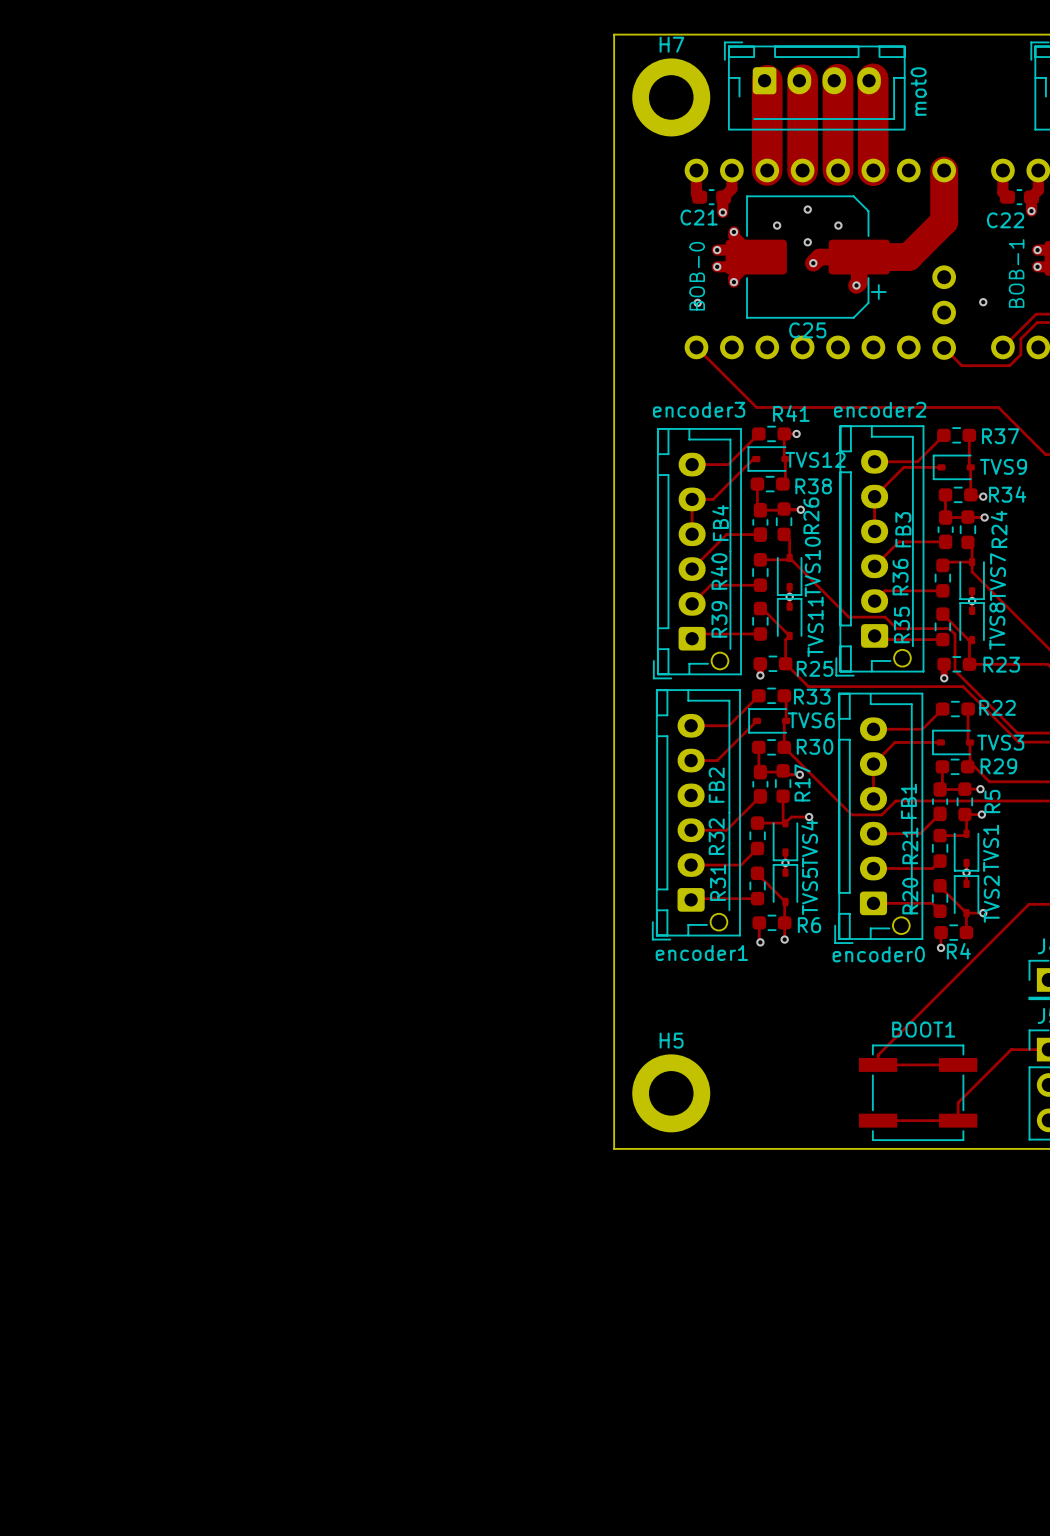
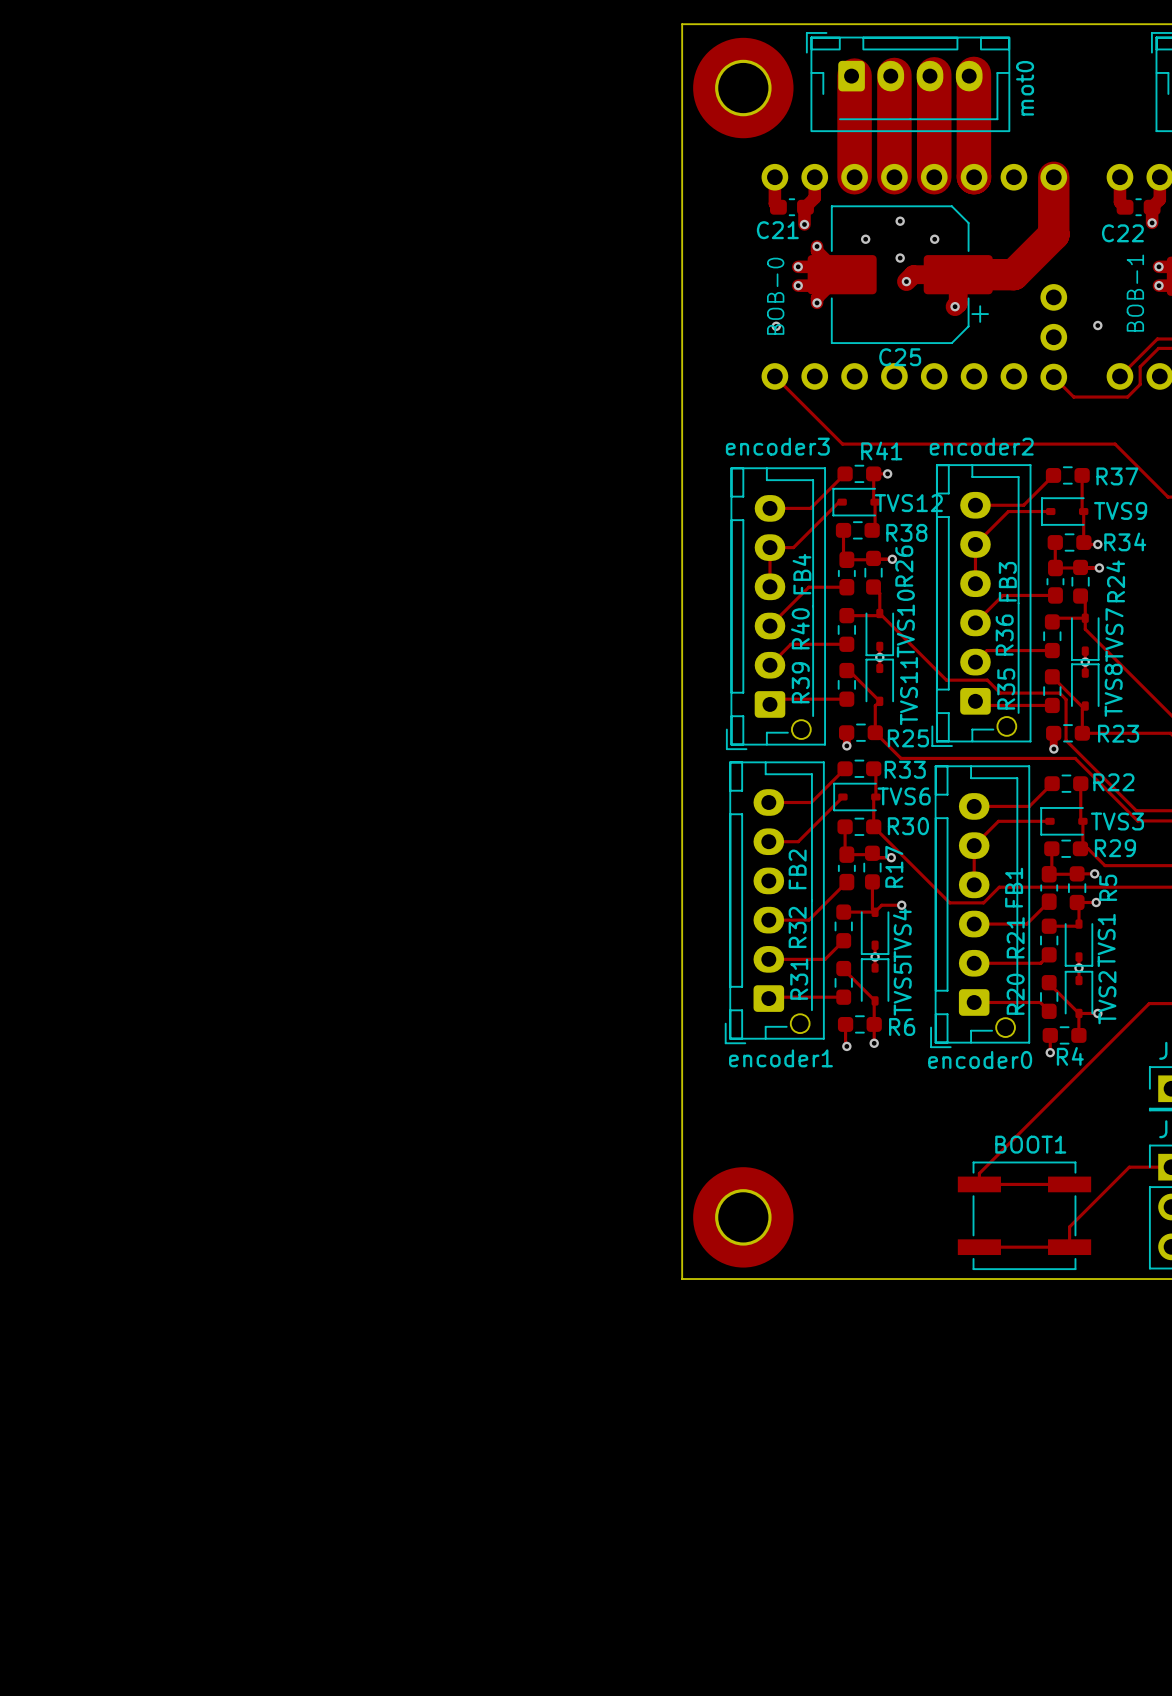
part: none -> (743, 88)
H7: (671, 97) -> none
H5: (671, 1093) -> none
part: none -> (743, 1217)

